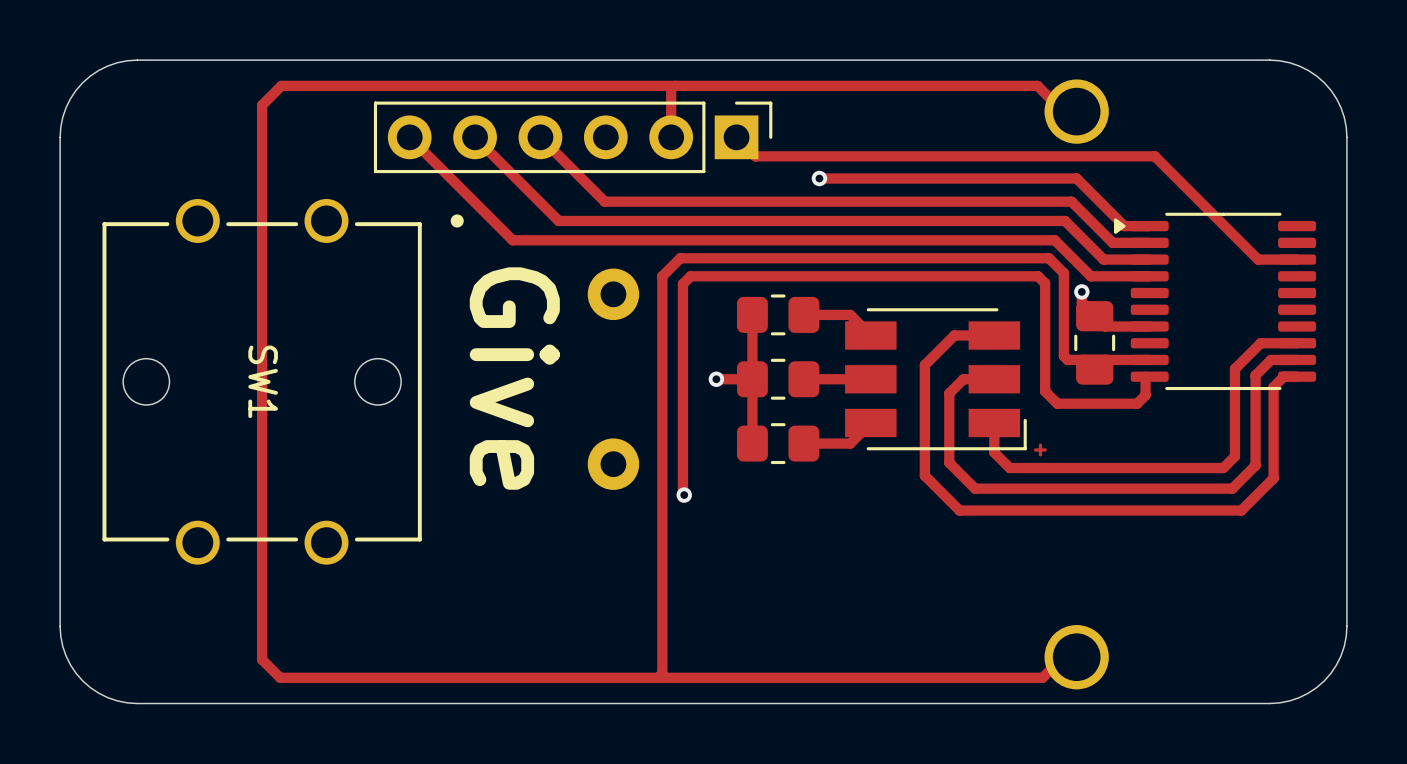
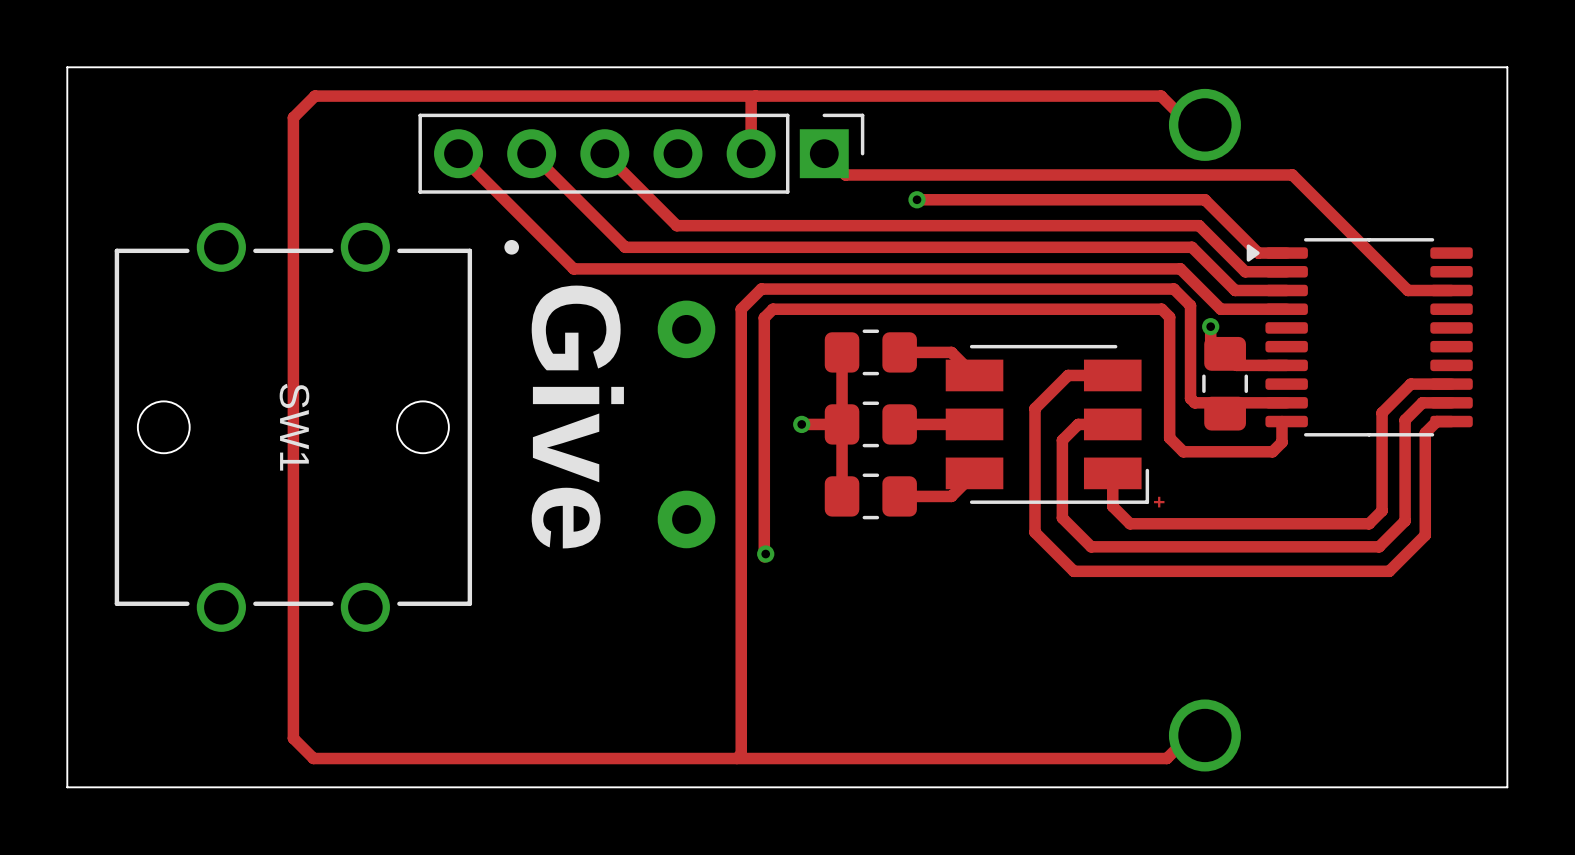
board edge: (137, 60) (107, 66) (82, 82) (66, 107) (60, 137) -> (153, 67) (67, 67) (67, 153)
board edge: (1269, 60) (1299, 66) (1324, 82) (1341, 107) (1346, 137) -> (1420, 67) (1507, 67) (1507, 153)
board edge: (60, 626) (66, 655) (82, 680) (107, 697) (137, 703) -> (67, 700) (67, 787) (153, 787)
board edge: (1346, 626) (1341, 655) (1324, 680) (1299, 697) (1269, 703) -> (1507, 700) (1507, 787) (1420, 787)

